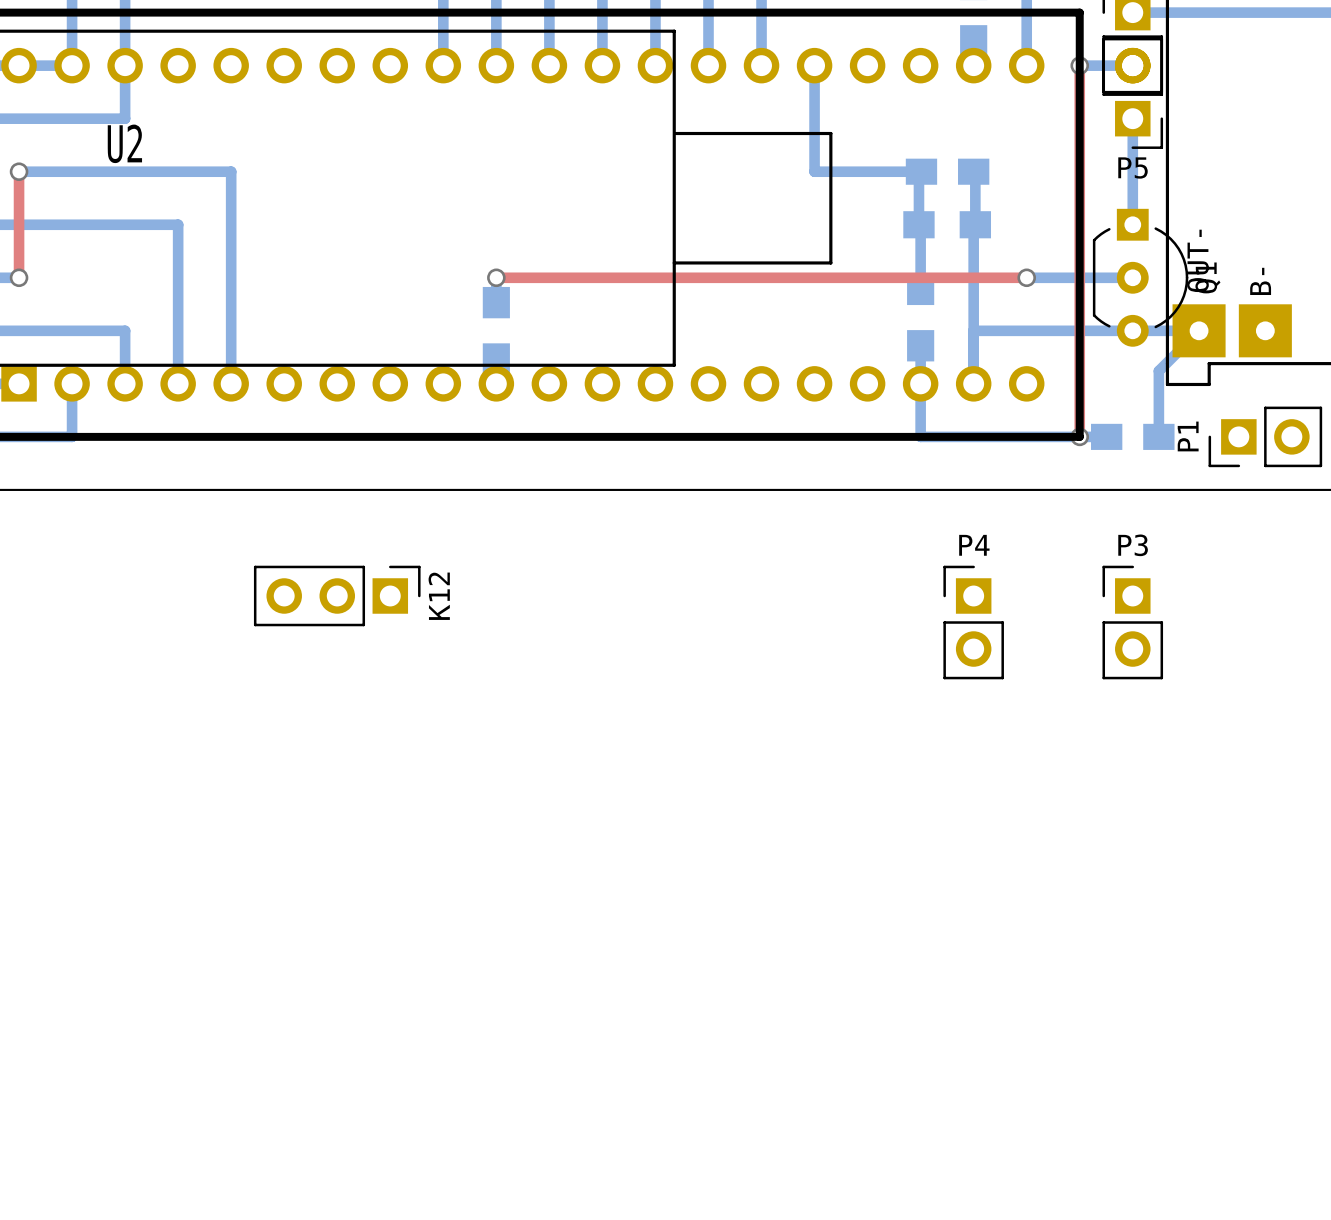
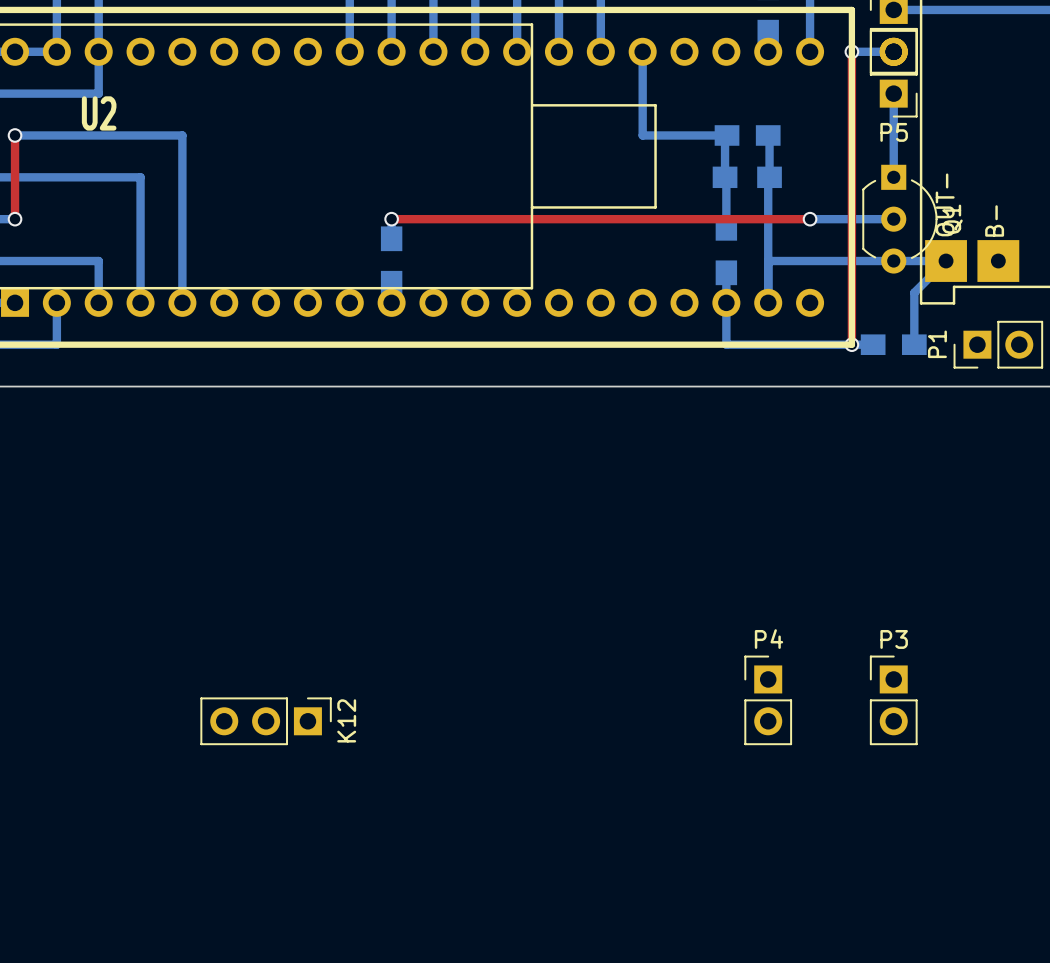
K12 position: (337, 595) -> (266, 721)
P4 position: (973, 622) -> (768, 700)
P3 position: (1132, 622) -> (893, 700)

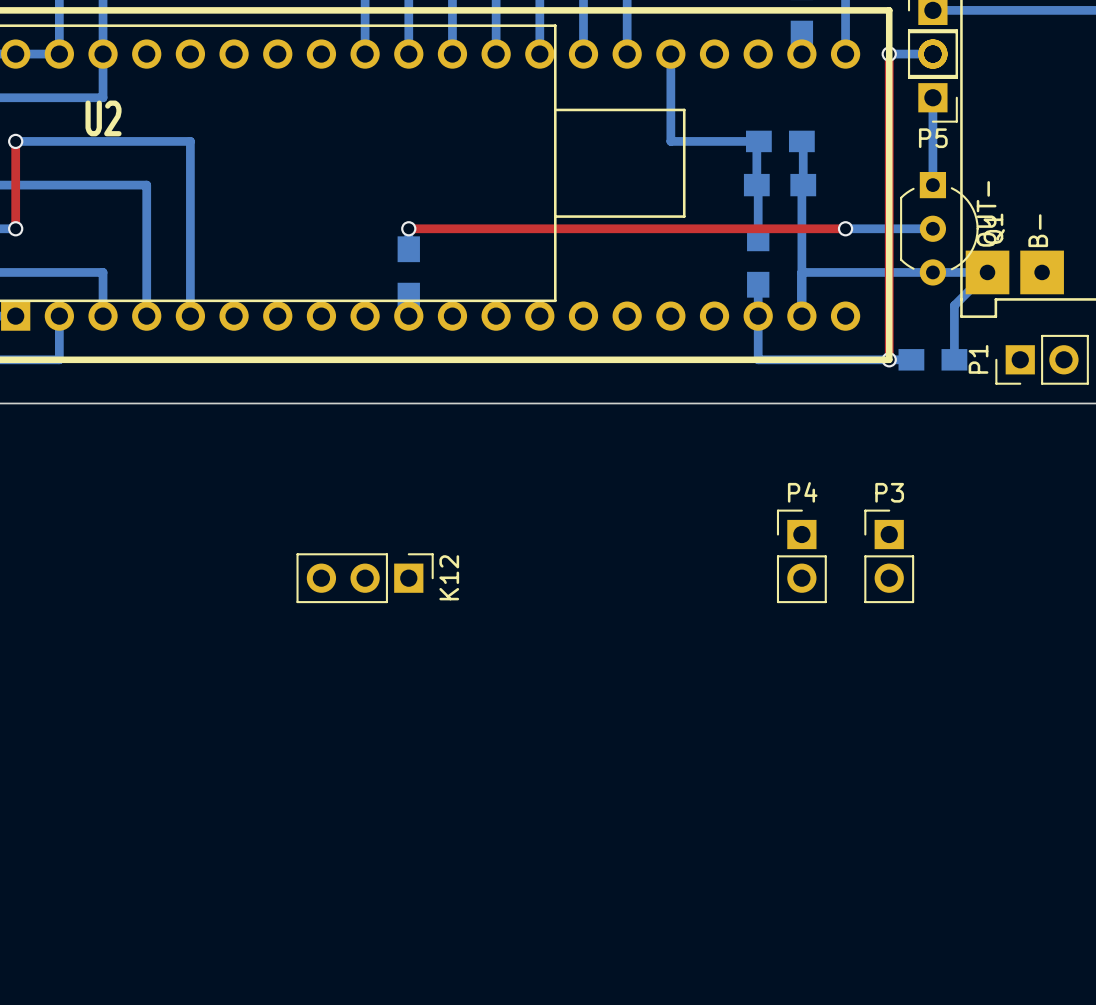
P4 position: (768, 700) -> (801, 556)
P3 position: (893, 700) -> (889, 556)
K12 position: (266, 721) -> (365, 578)

